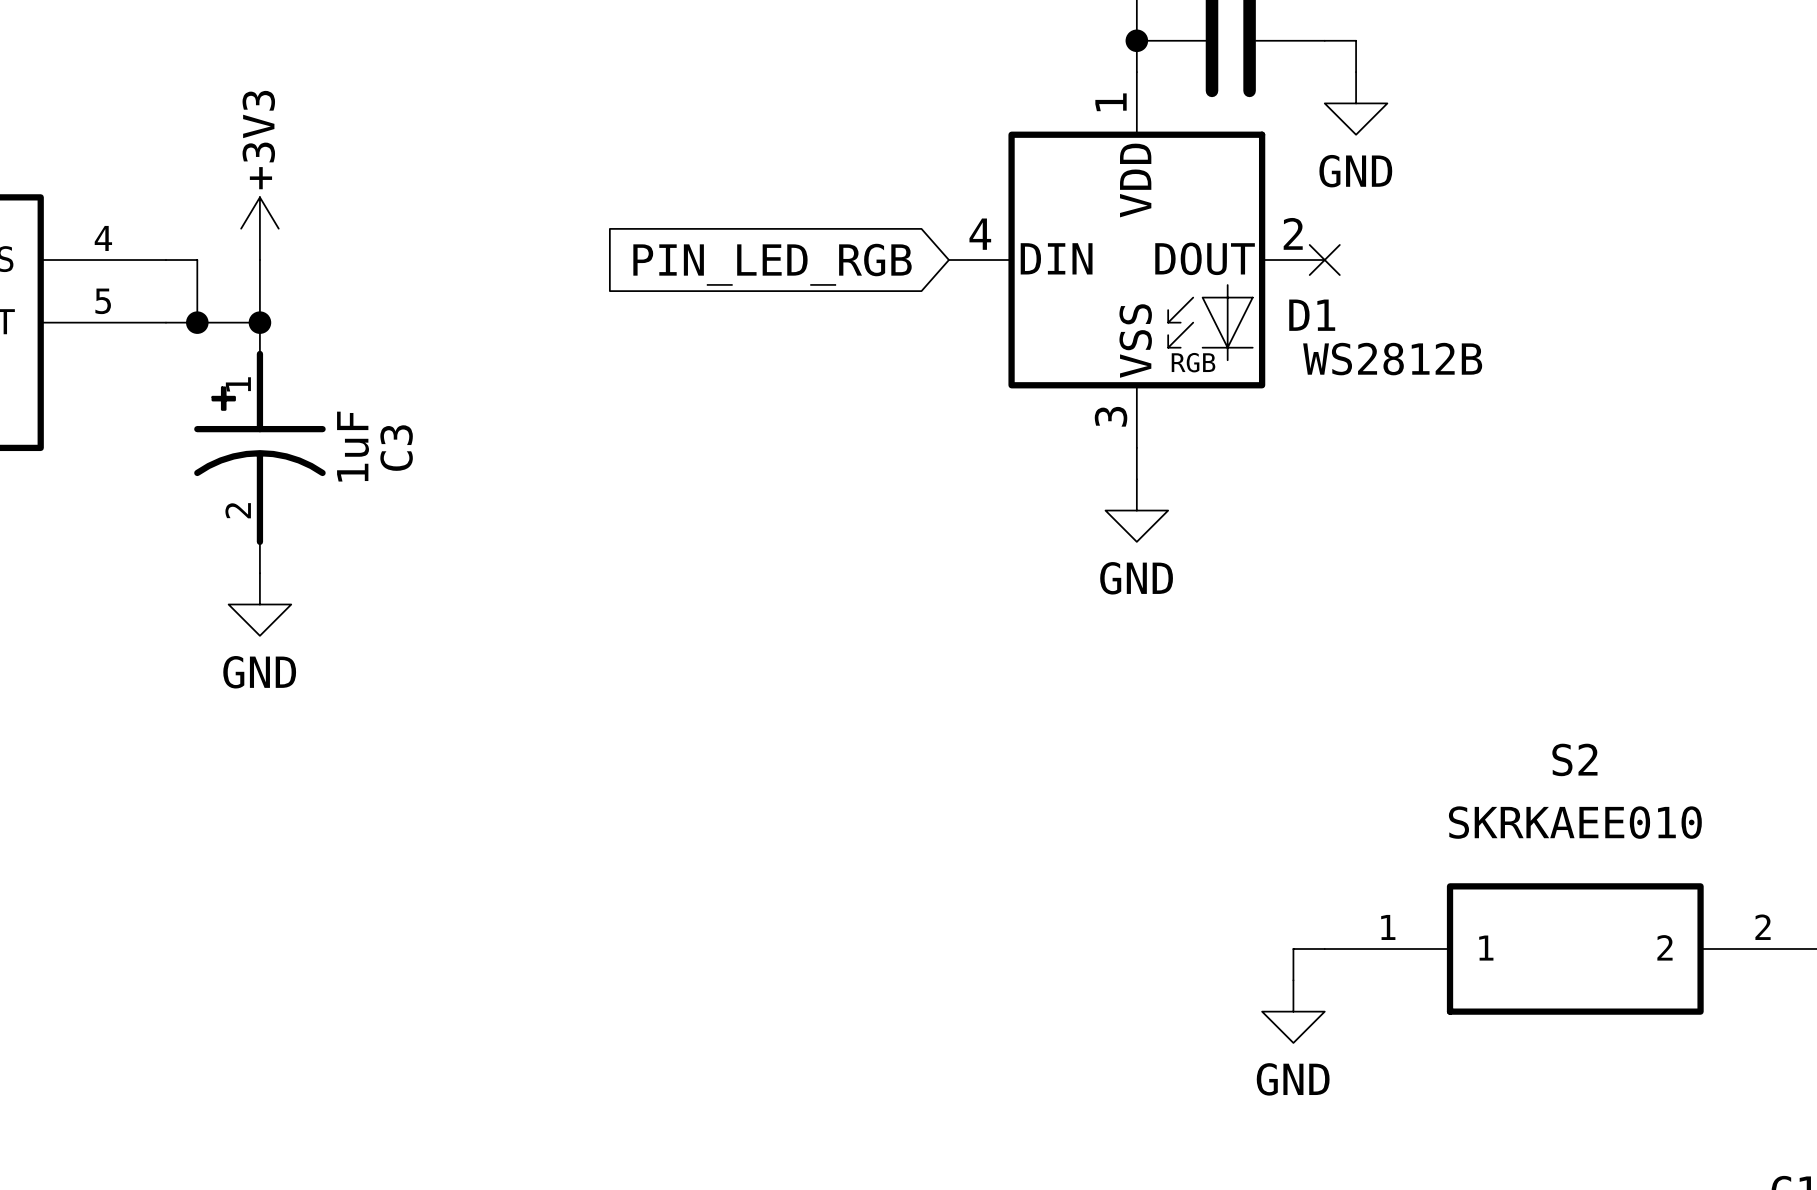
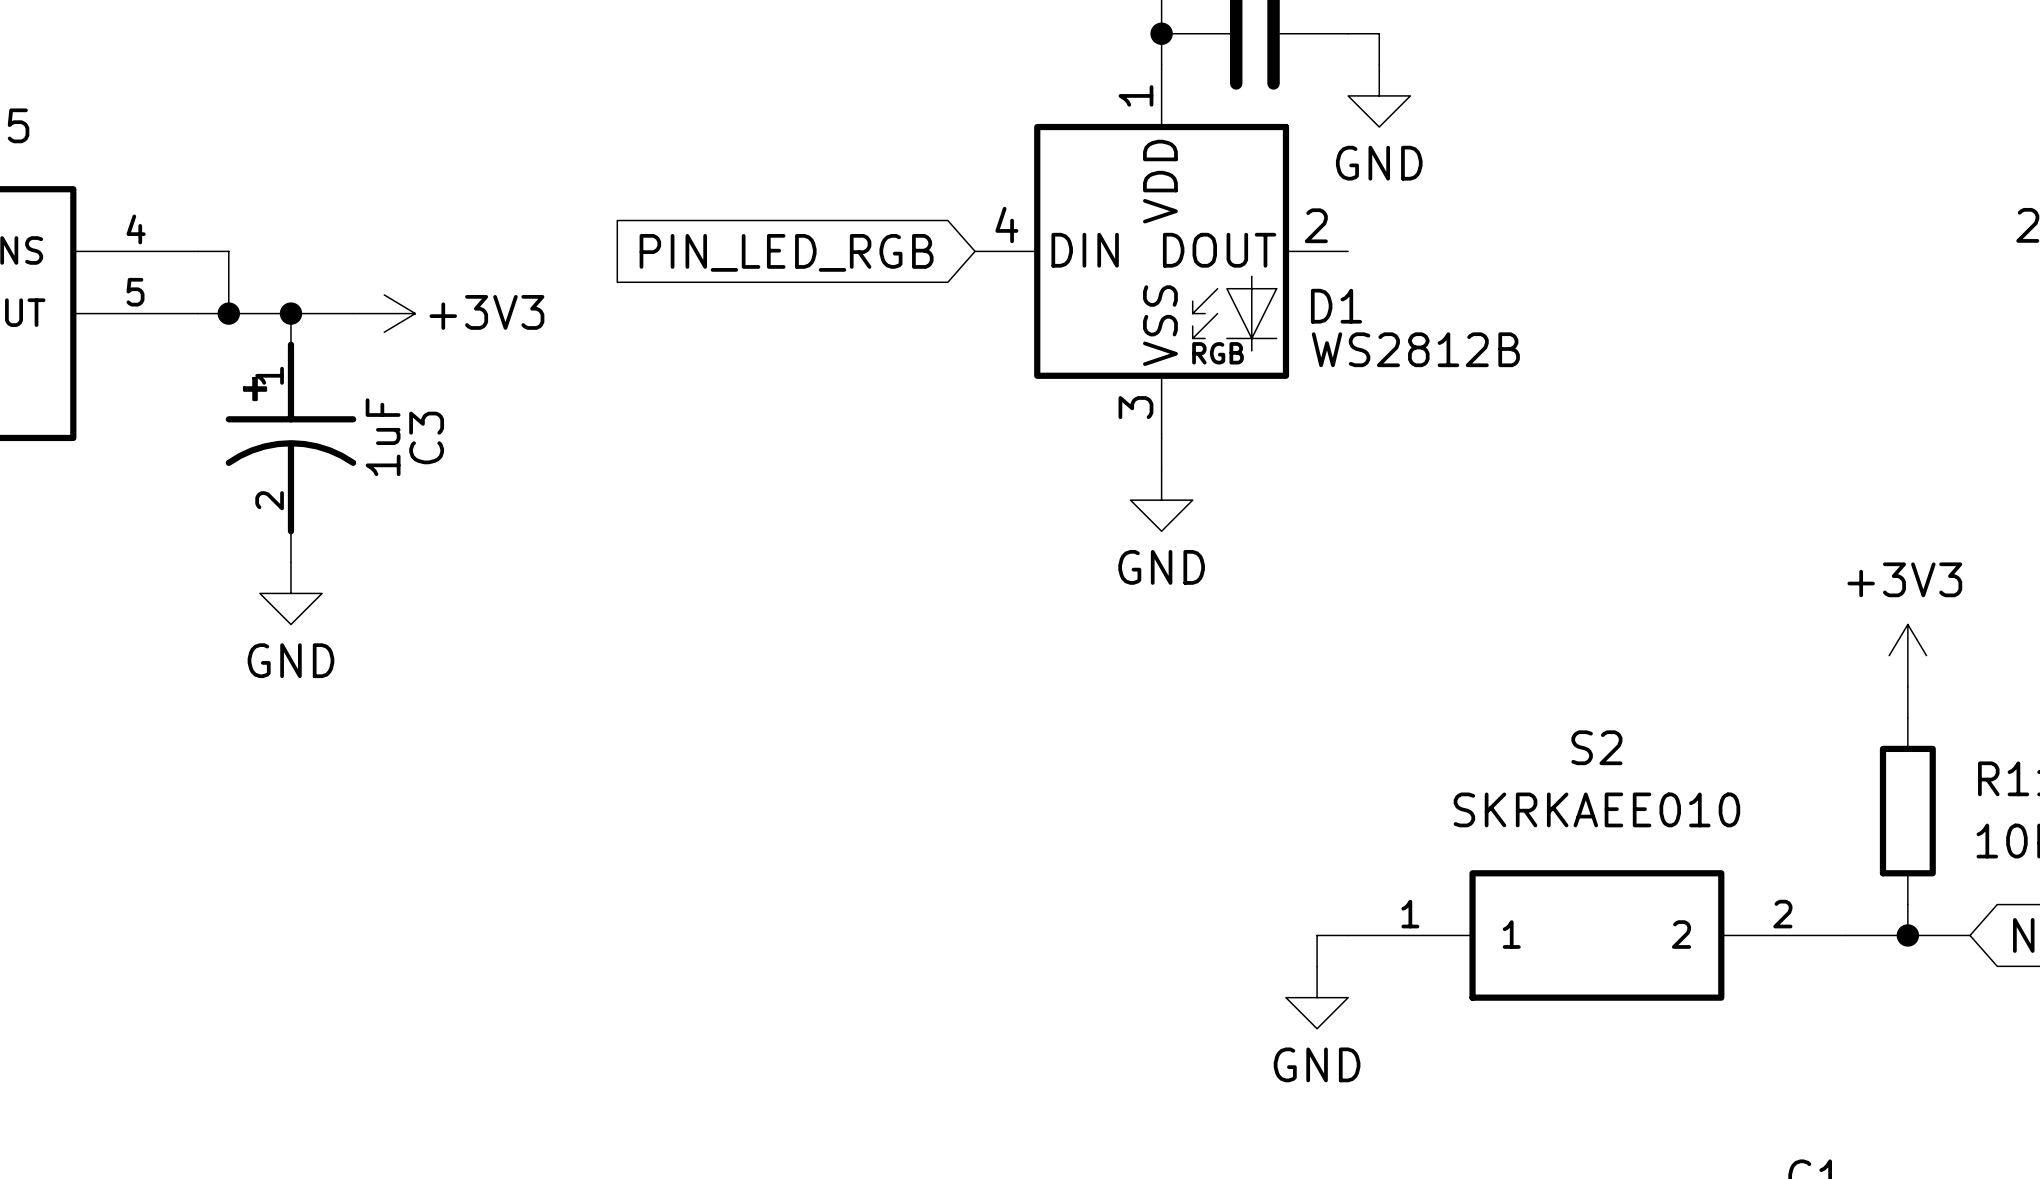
power symbol rotation: 0° (259, 228) -> 90° clockwise (384, 313)
power symbol position: +3V3 (259, 228) -> +3V3 (384, 313)
wire: (259, 260) (259, 322) -> (353, 313) (290, 313)
no-connect mark: (1324, 260) -> none

